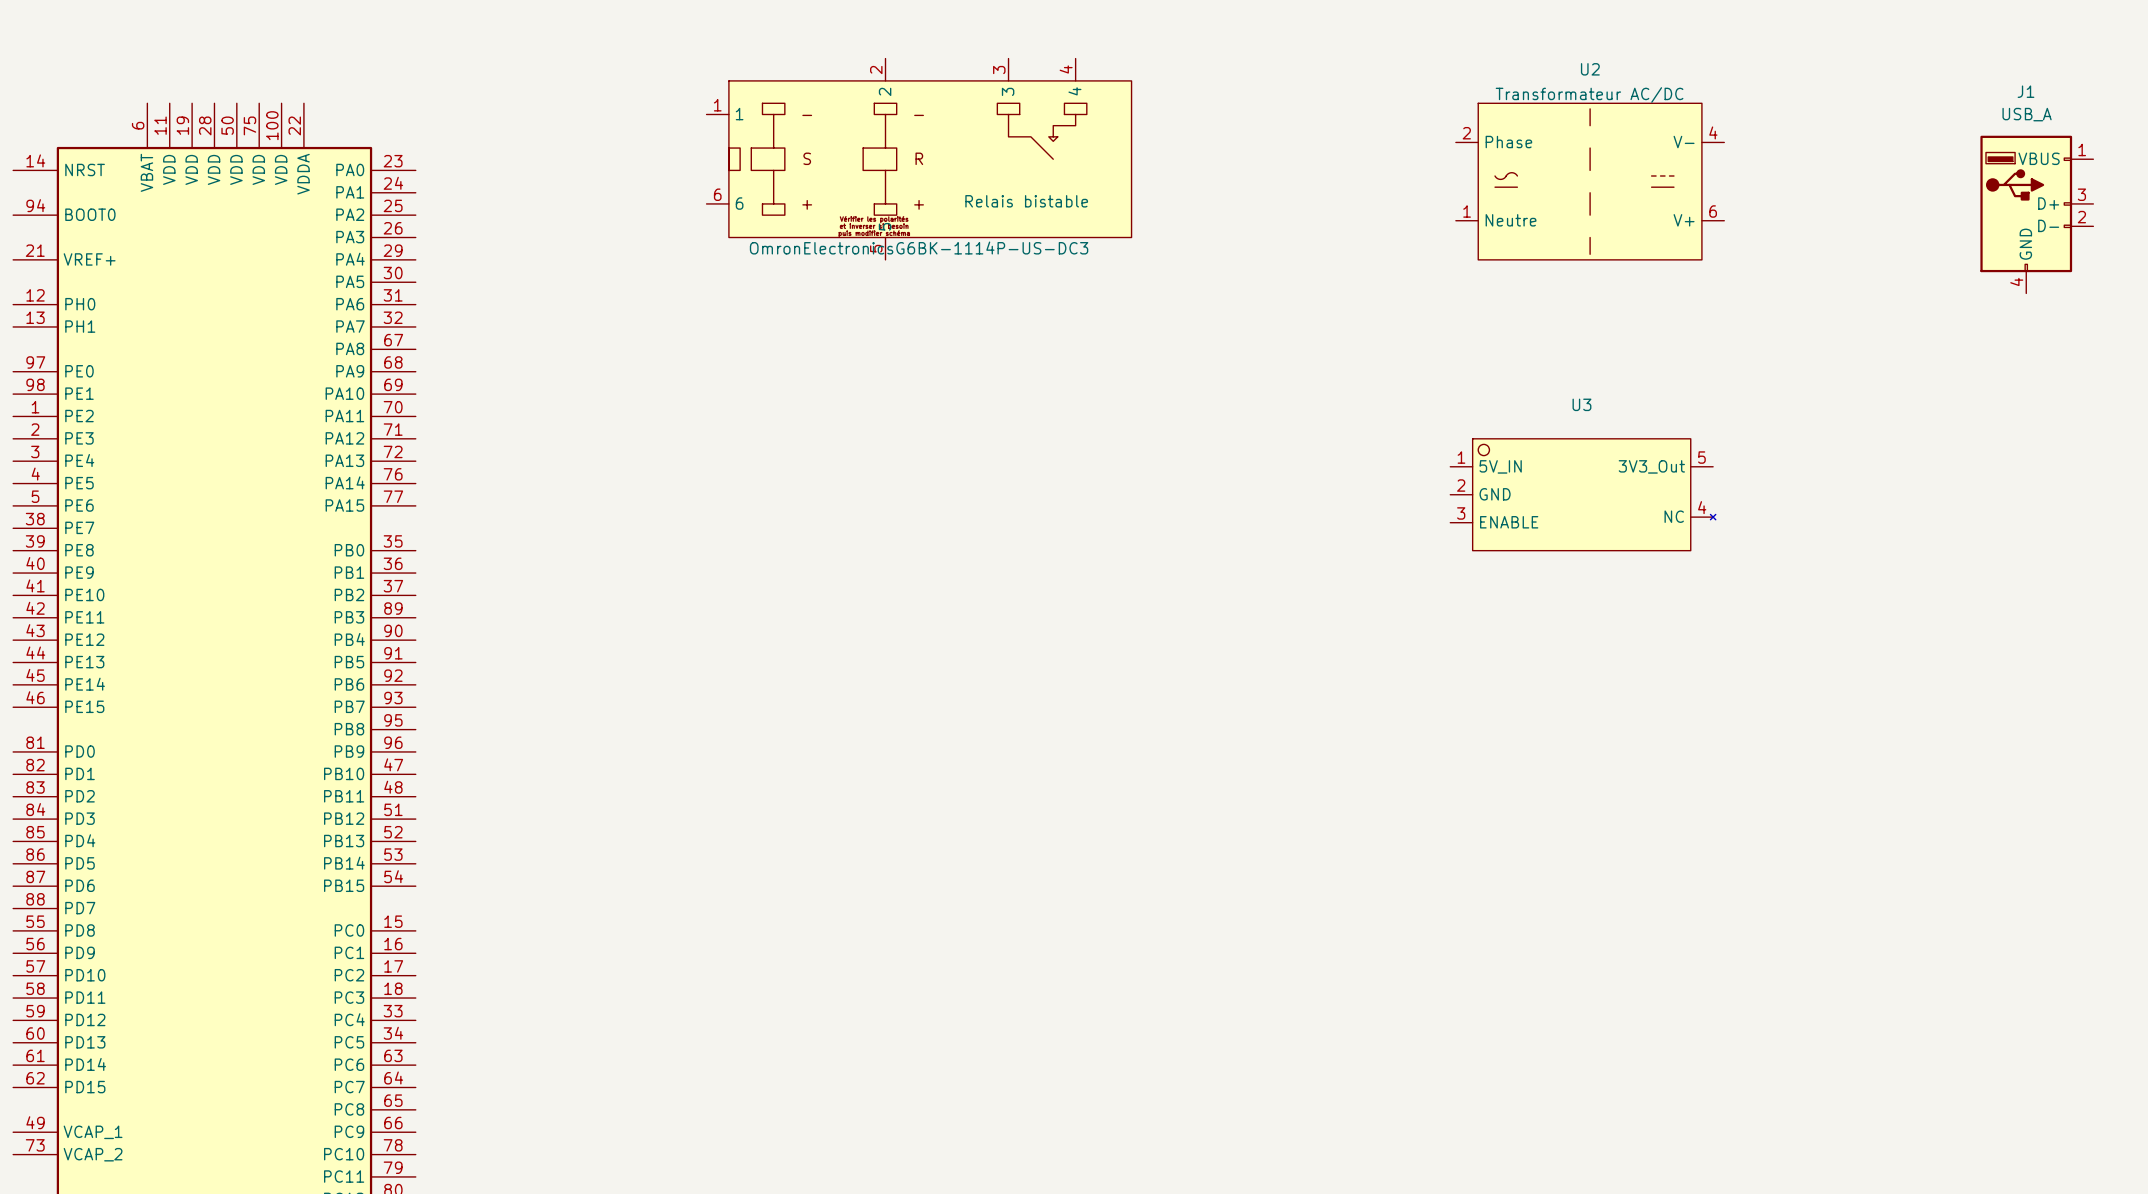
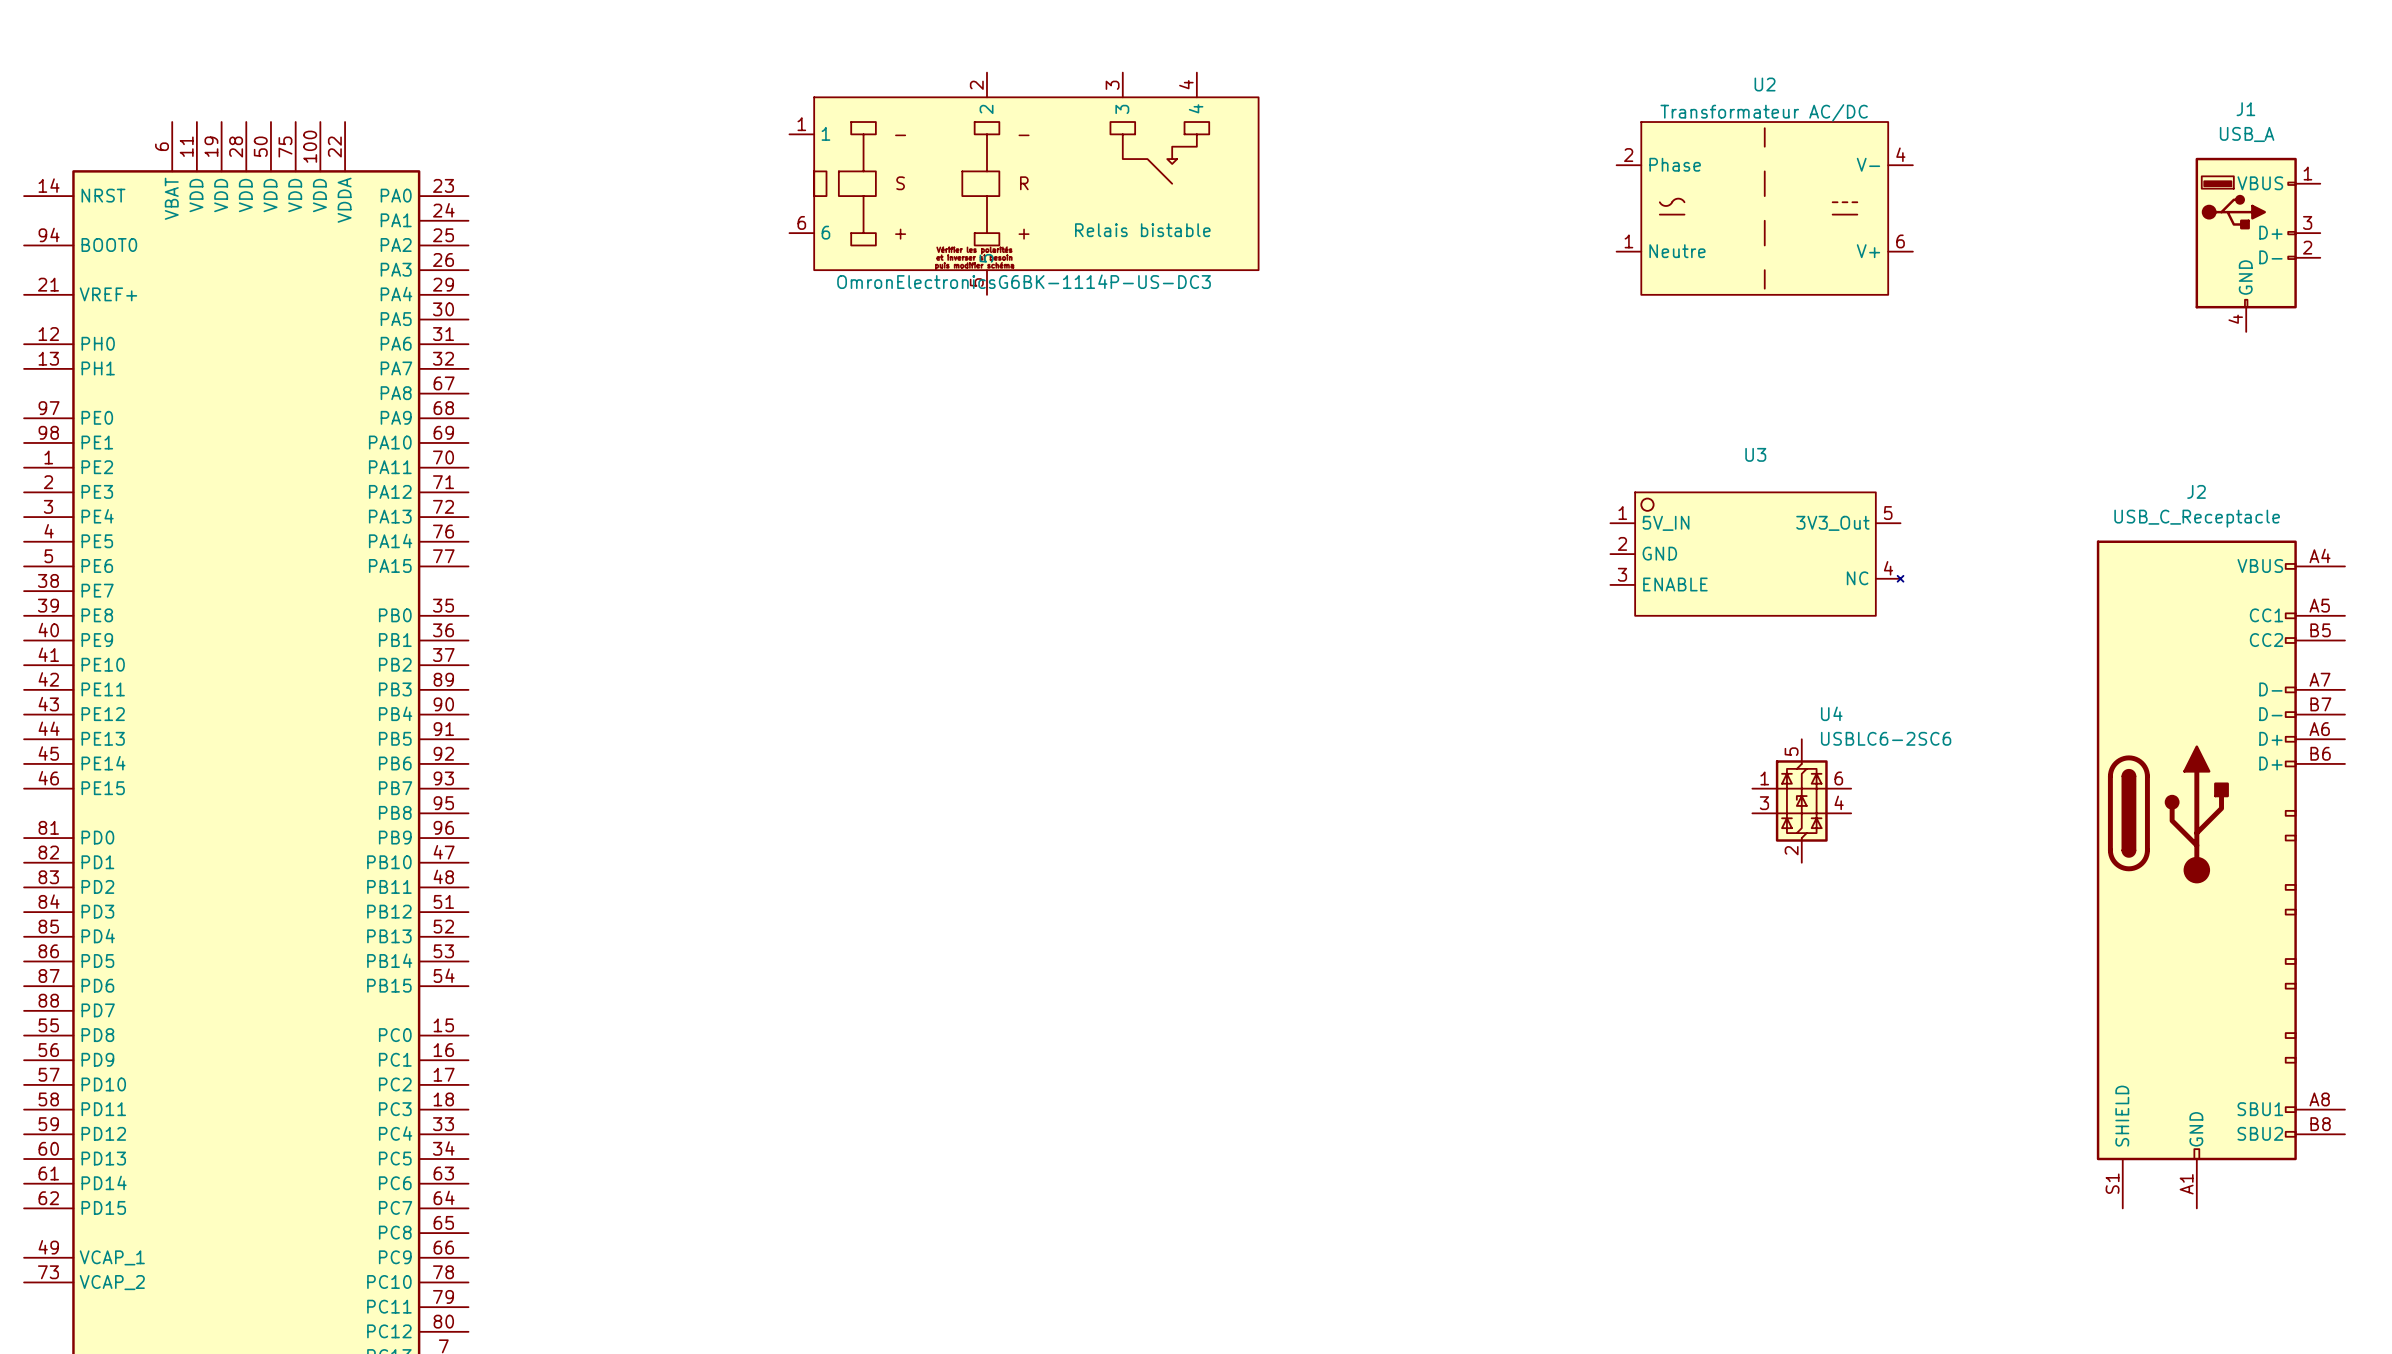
U4: none -> USBLC6-2SC6 (1801, 800)
J2: none -> USB_C_Receptacle (2220, 874)

